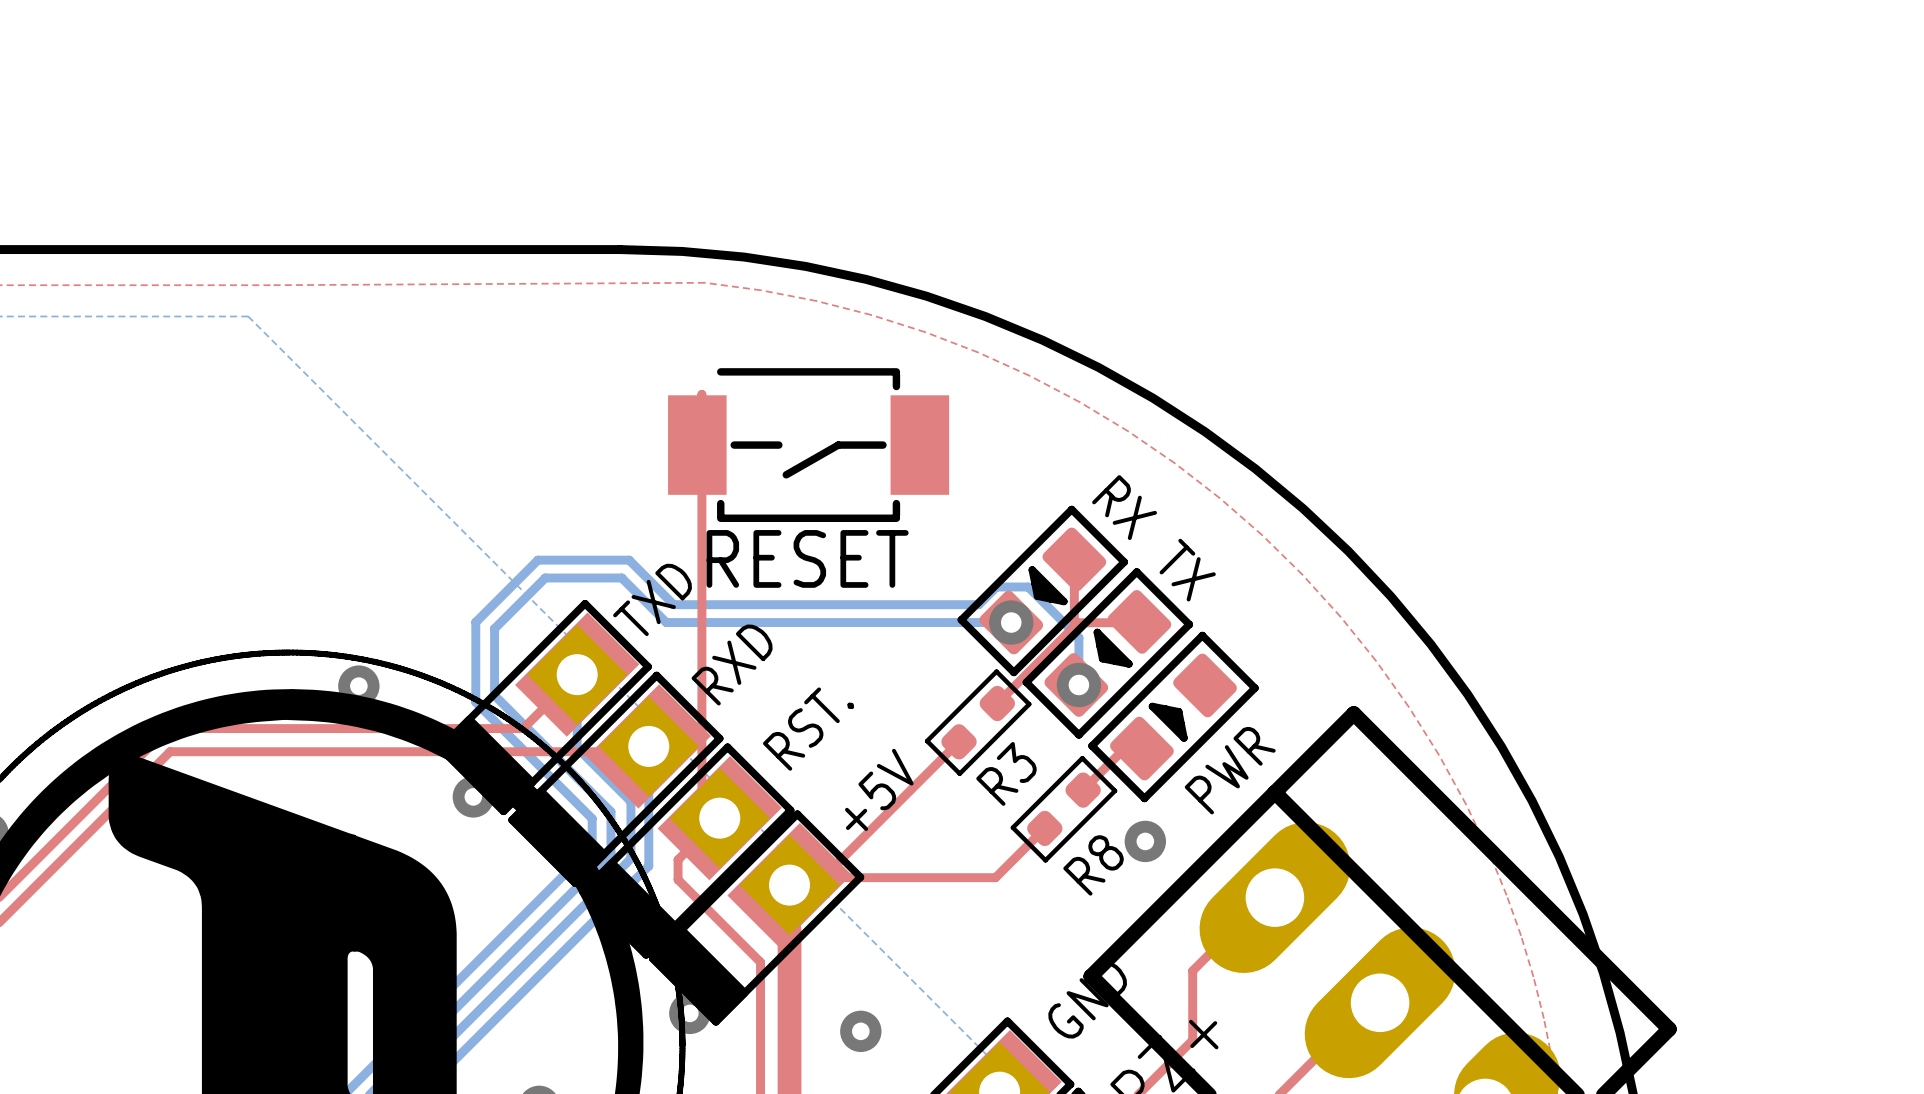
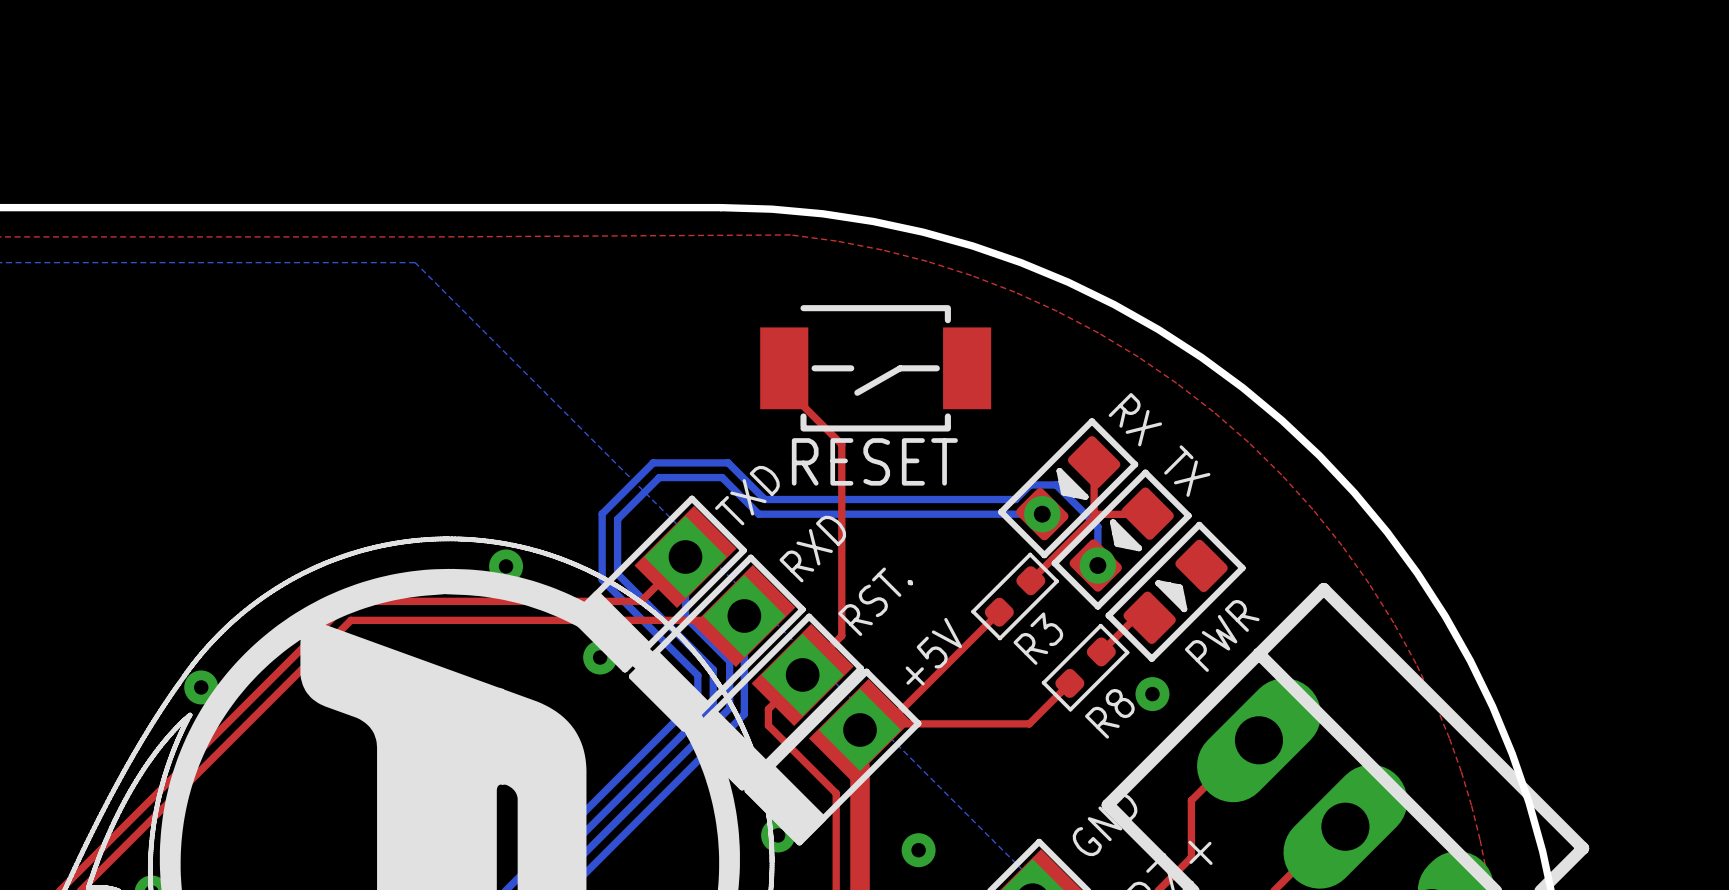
top track: (697, 445) (701, 394) (701, 800) (719, 818) -> (784, 368) (784, 386) (841, 444) (841, 635) (802, 674)

